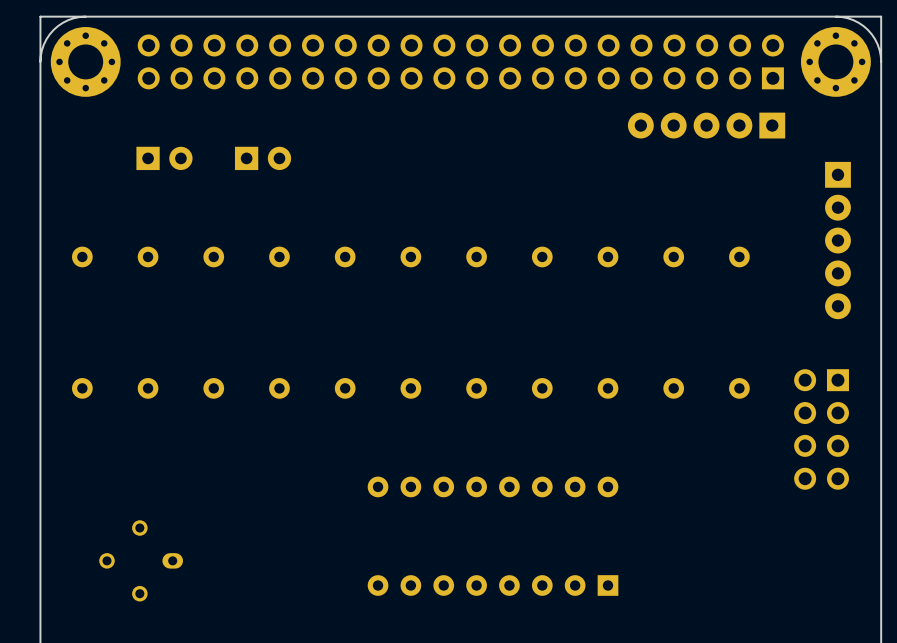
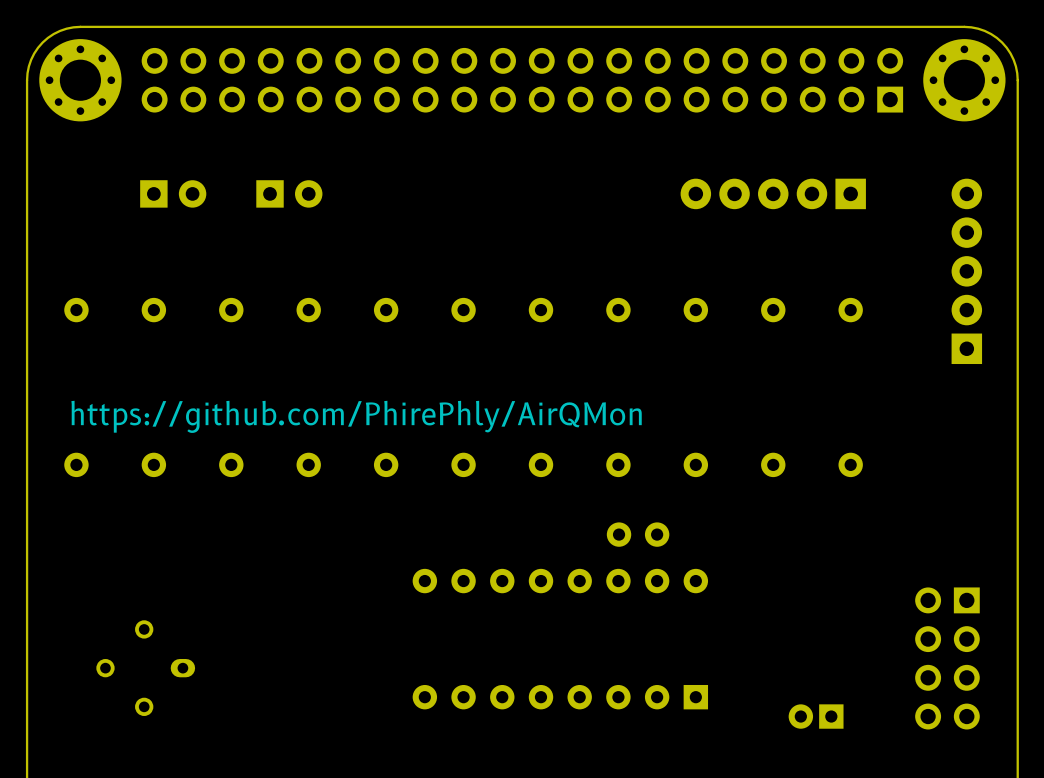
board edge: (85, 16) (40, 16) (40, 61) -> none
board edge: (835, 16) (881, 16) (881, 61) -> none
part position: (706, 125) -> (773, 193)
part rotation: 0° (837, 240) -> 180° (966, 271)
text: none -> https://github.com/PhirePhly/AirQMon (356, 416)
part position: (821, 429) -> (947, 658)
part: none -> (638, 534)
part: none -> (816, 716)

